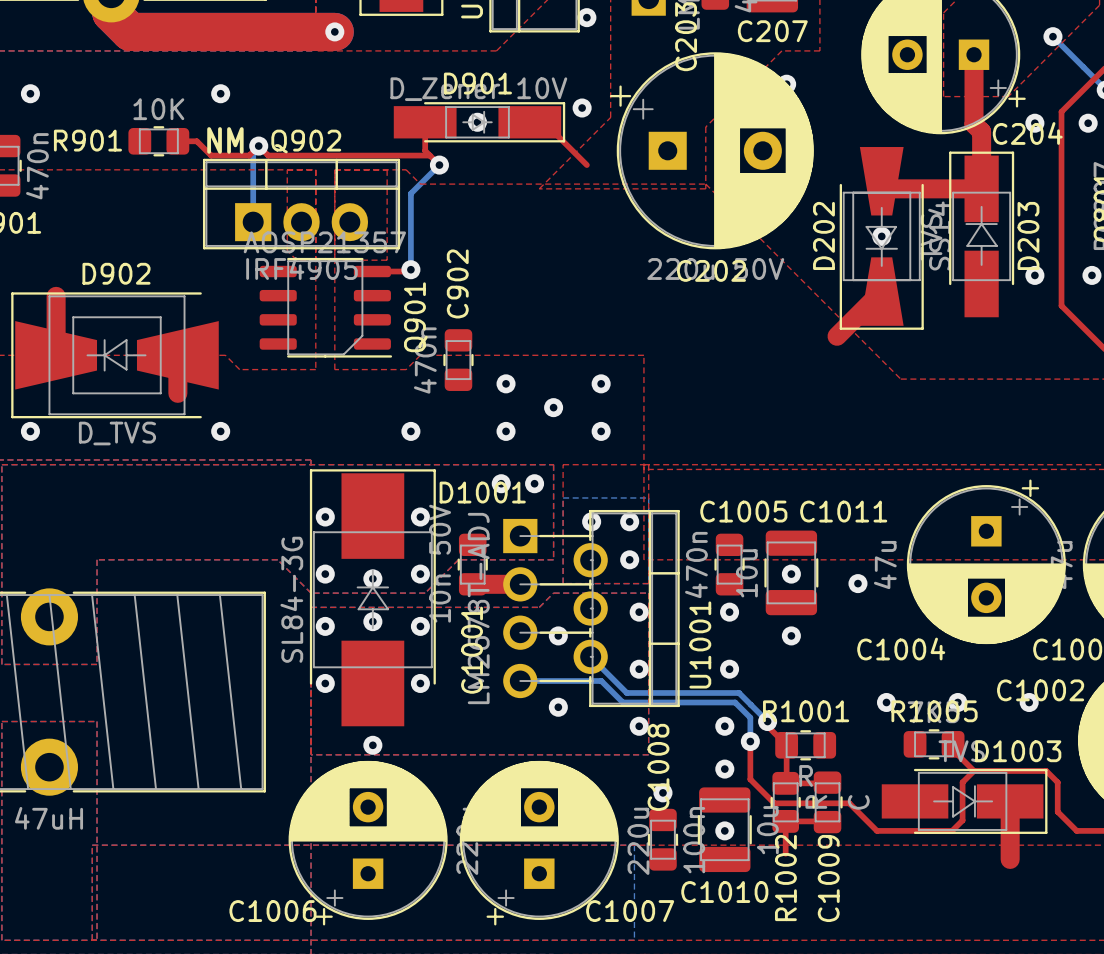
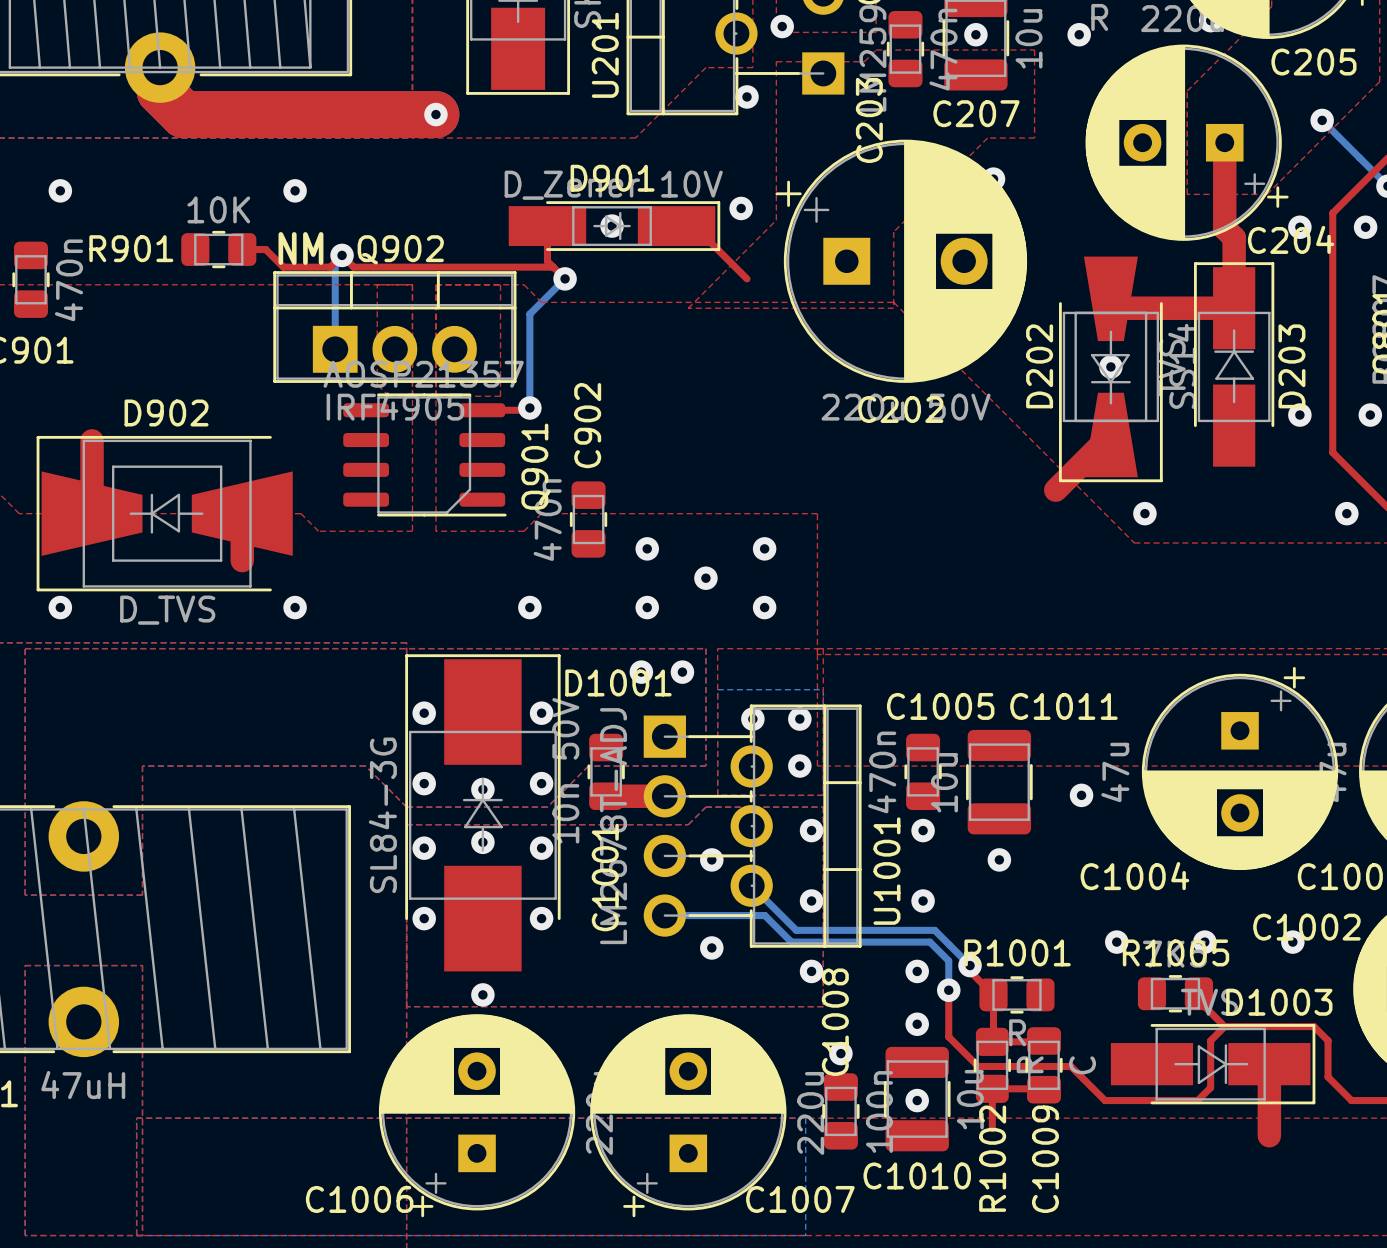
via: none -> (1144, 513)
via: none -> (1346, 513)
via: (791, 574) -> none

